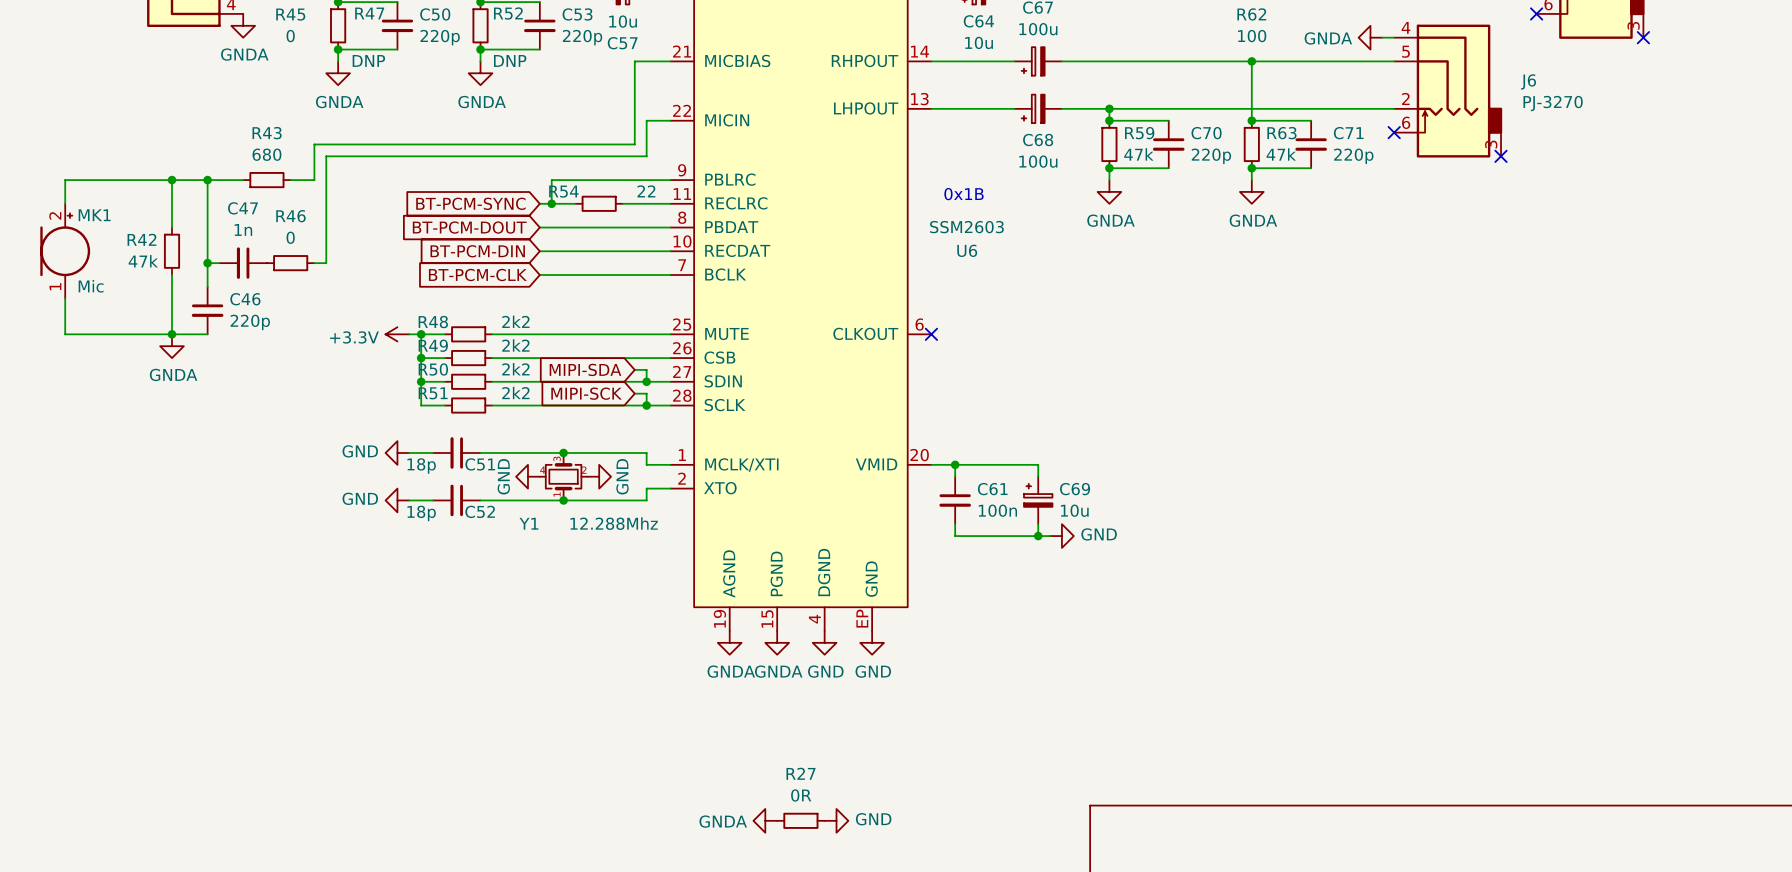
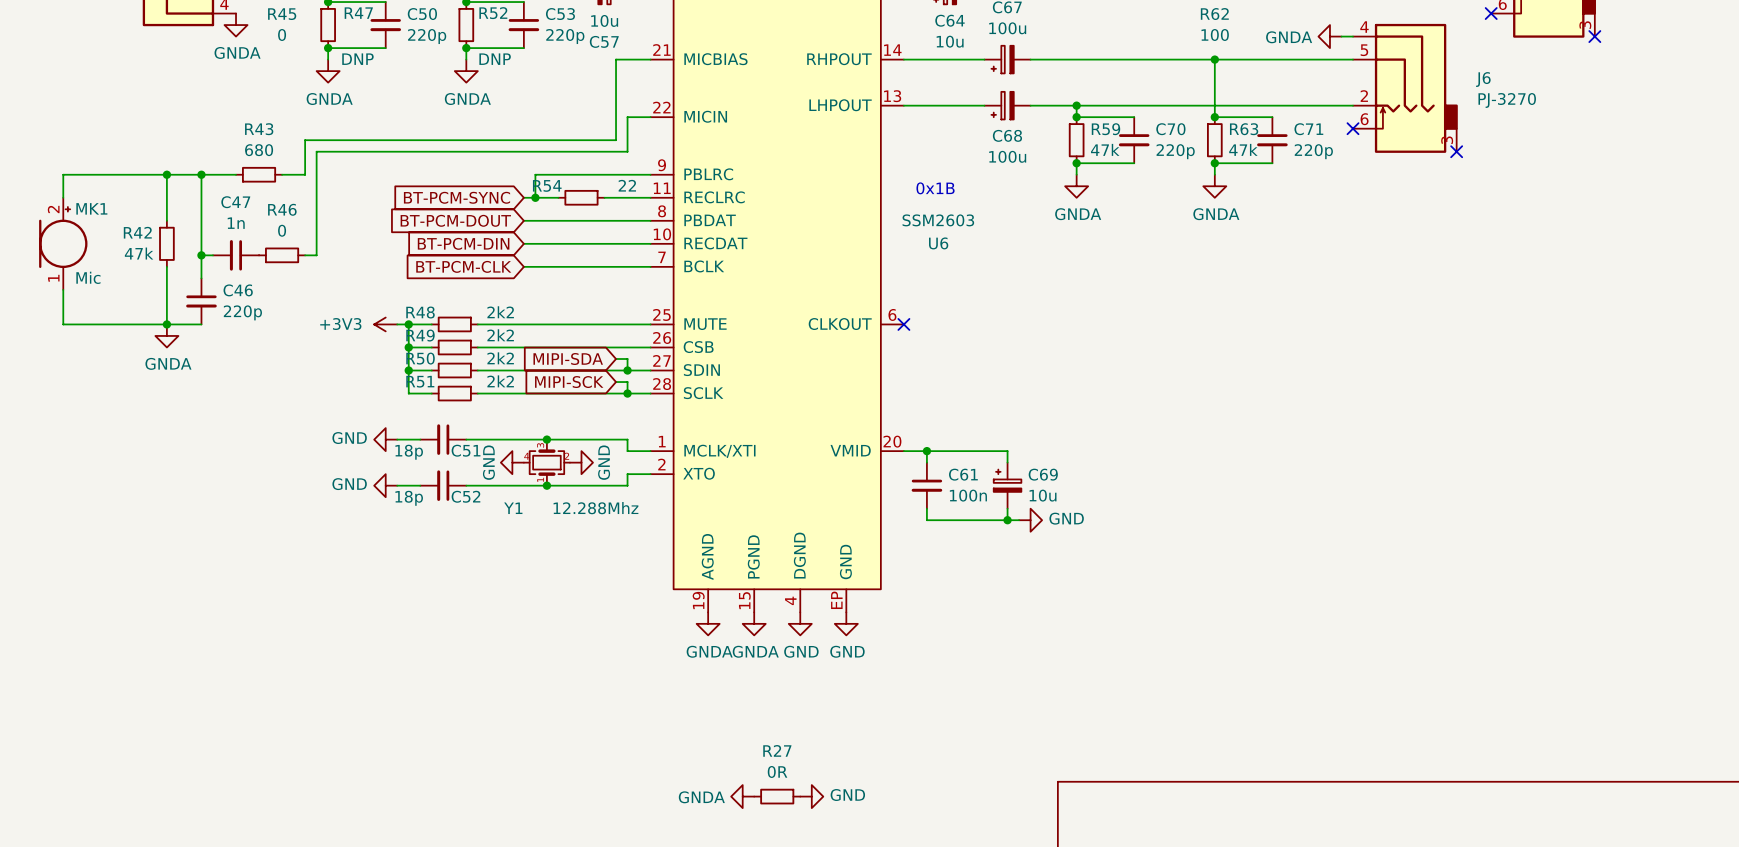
power symbol: +3.3V (397, 334) -> +3V3 (385, 324)

